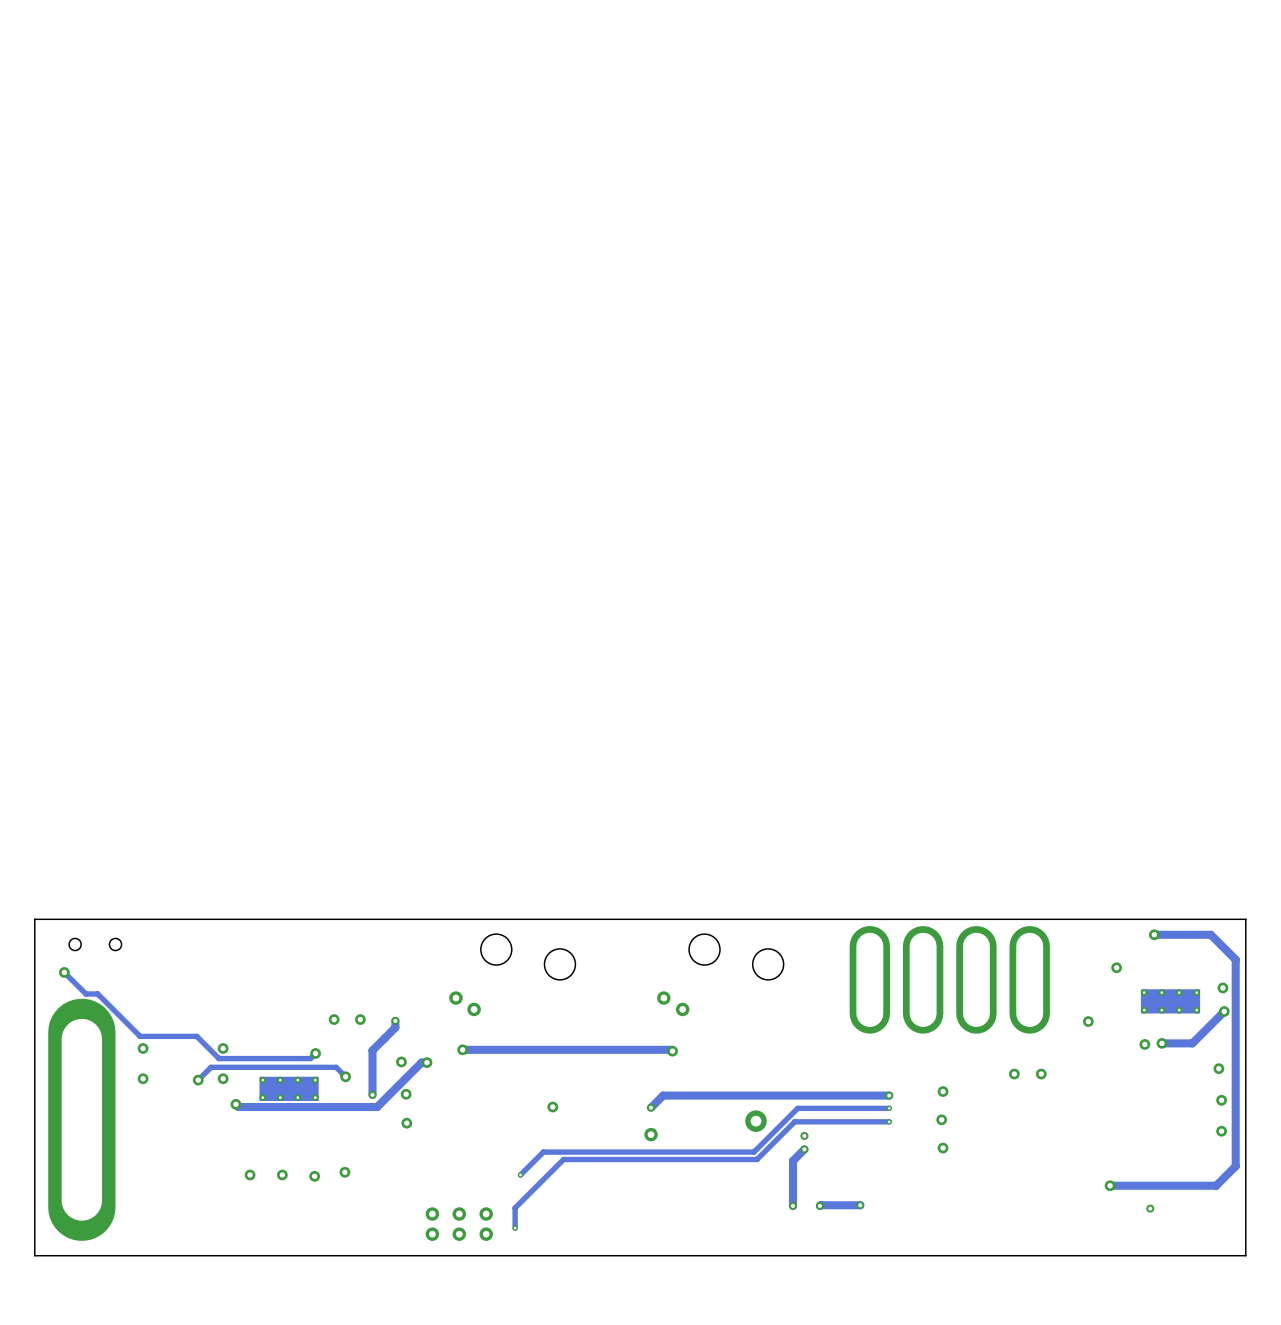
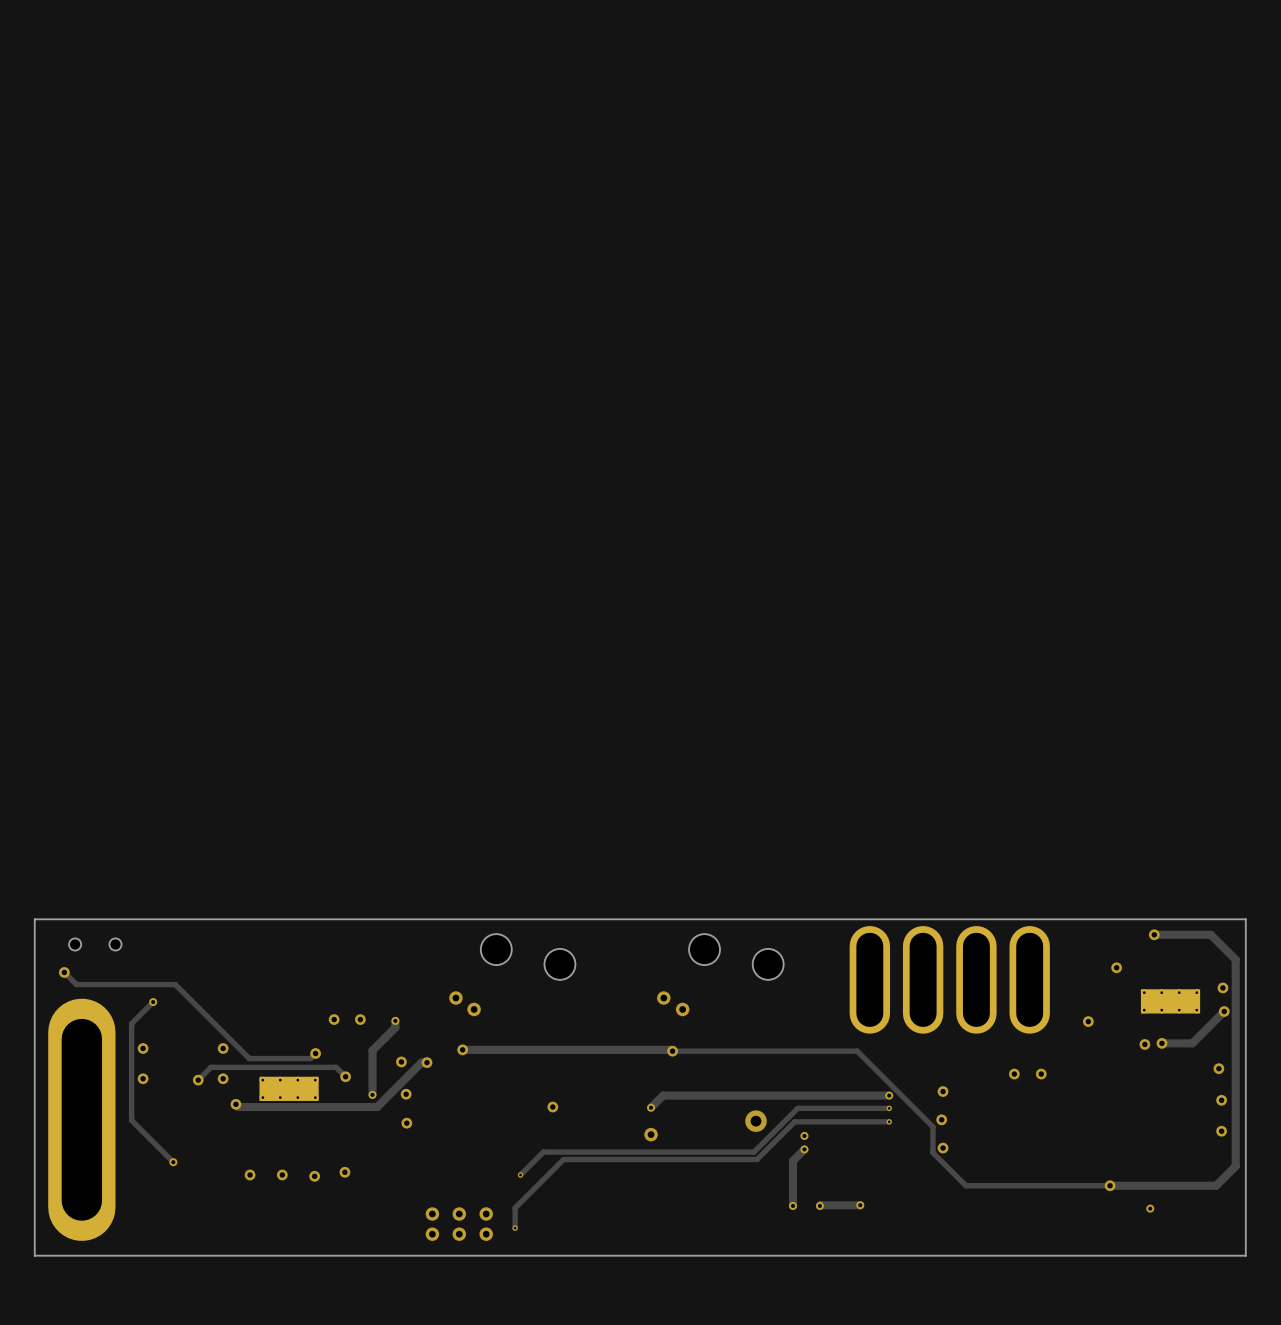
track: (76, 984) (85, 994) (97, 994) (140, 1036) (196, 1036) (218, 1058) (249, 1058) -> (76, 984) (175, 984) (249, 1058)
track: none -> (153, 1002) (131, 1023) (131, 1120) (173, 1162)
via: none -> (153, 1002)
track: none -> (462, 1051) (857, 1051) (932, 1126) (932, 1152) (965, 1185) (1110, 1185)
via: none -> (173, 1162)

